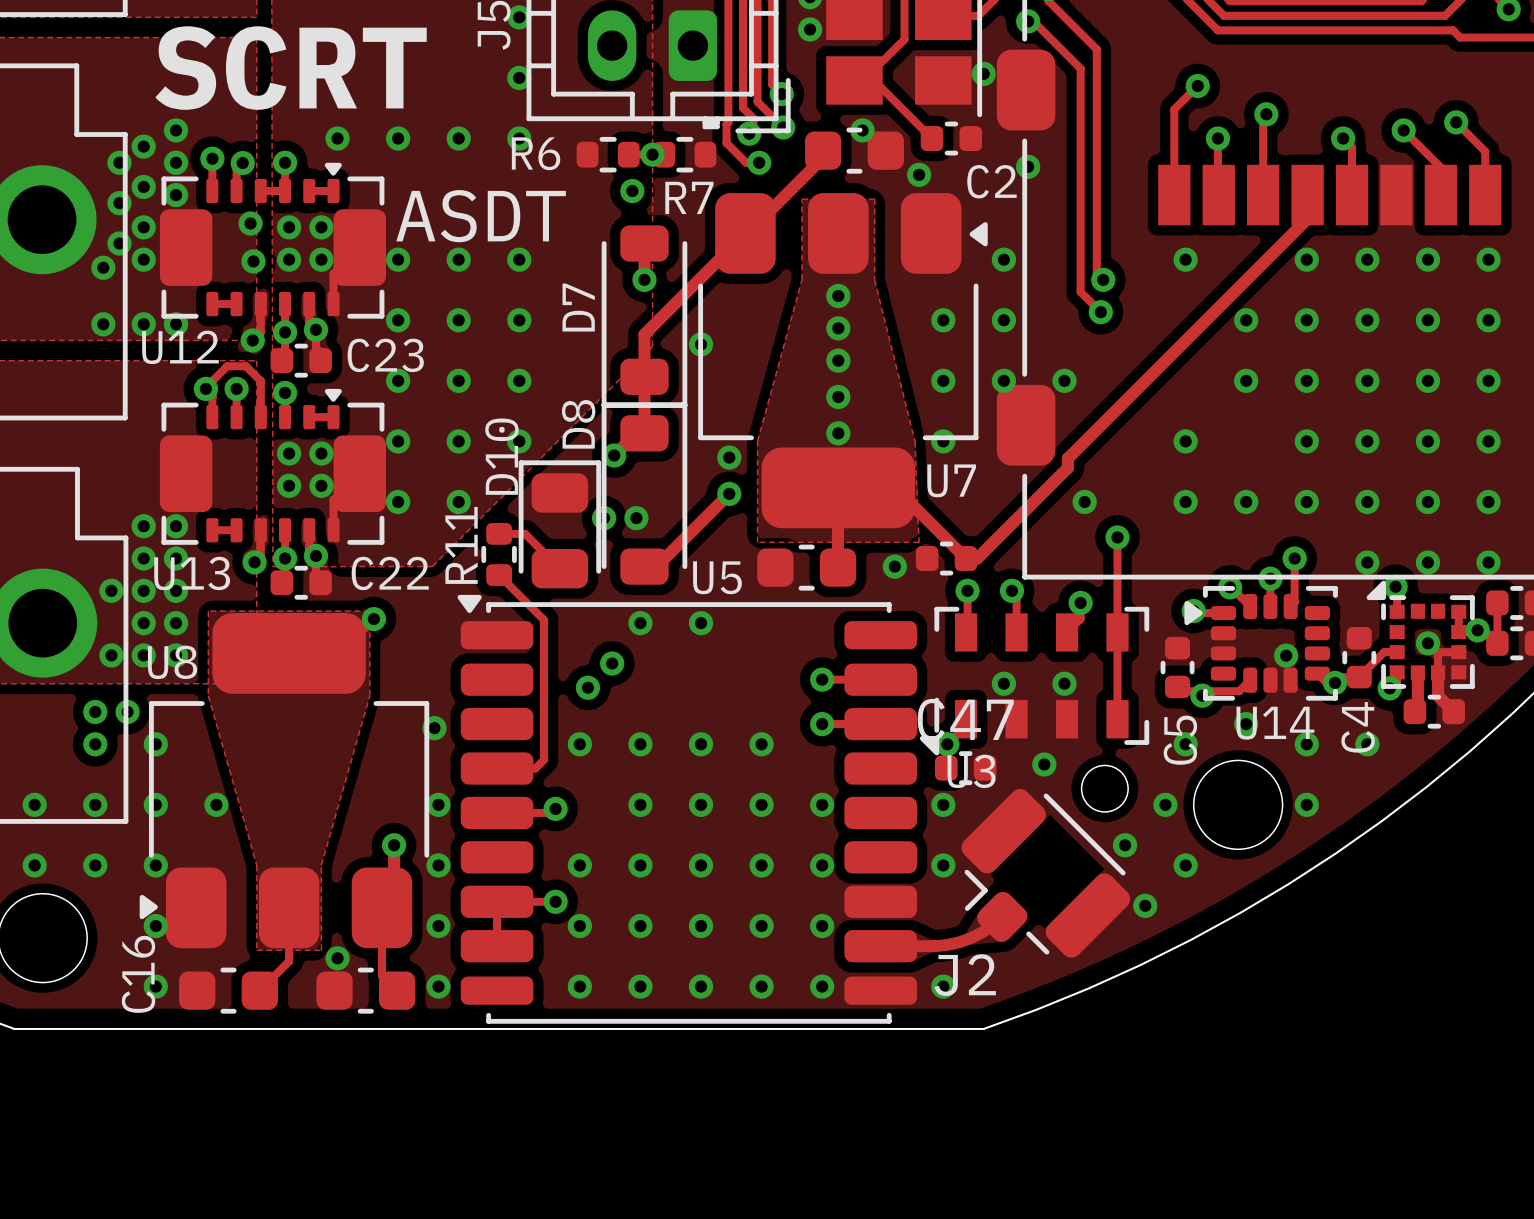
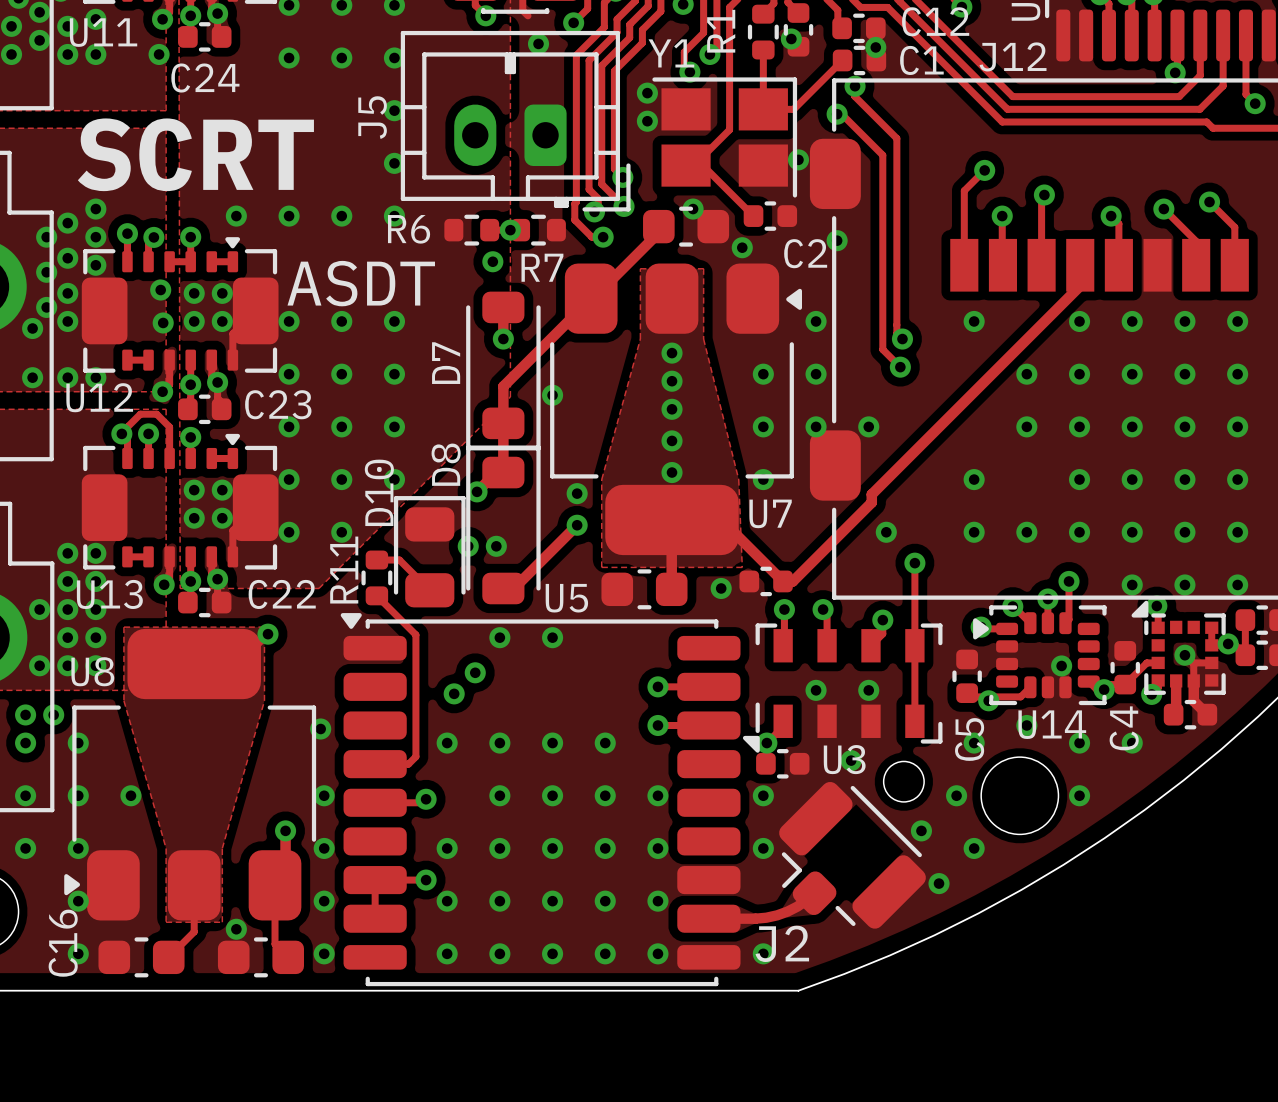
C47 name: C47 (965, 719) -> none
U3 name position: U3 (971, 771) -> U3 (844, 759)

